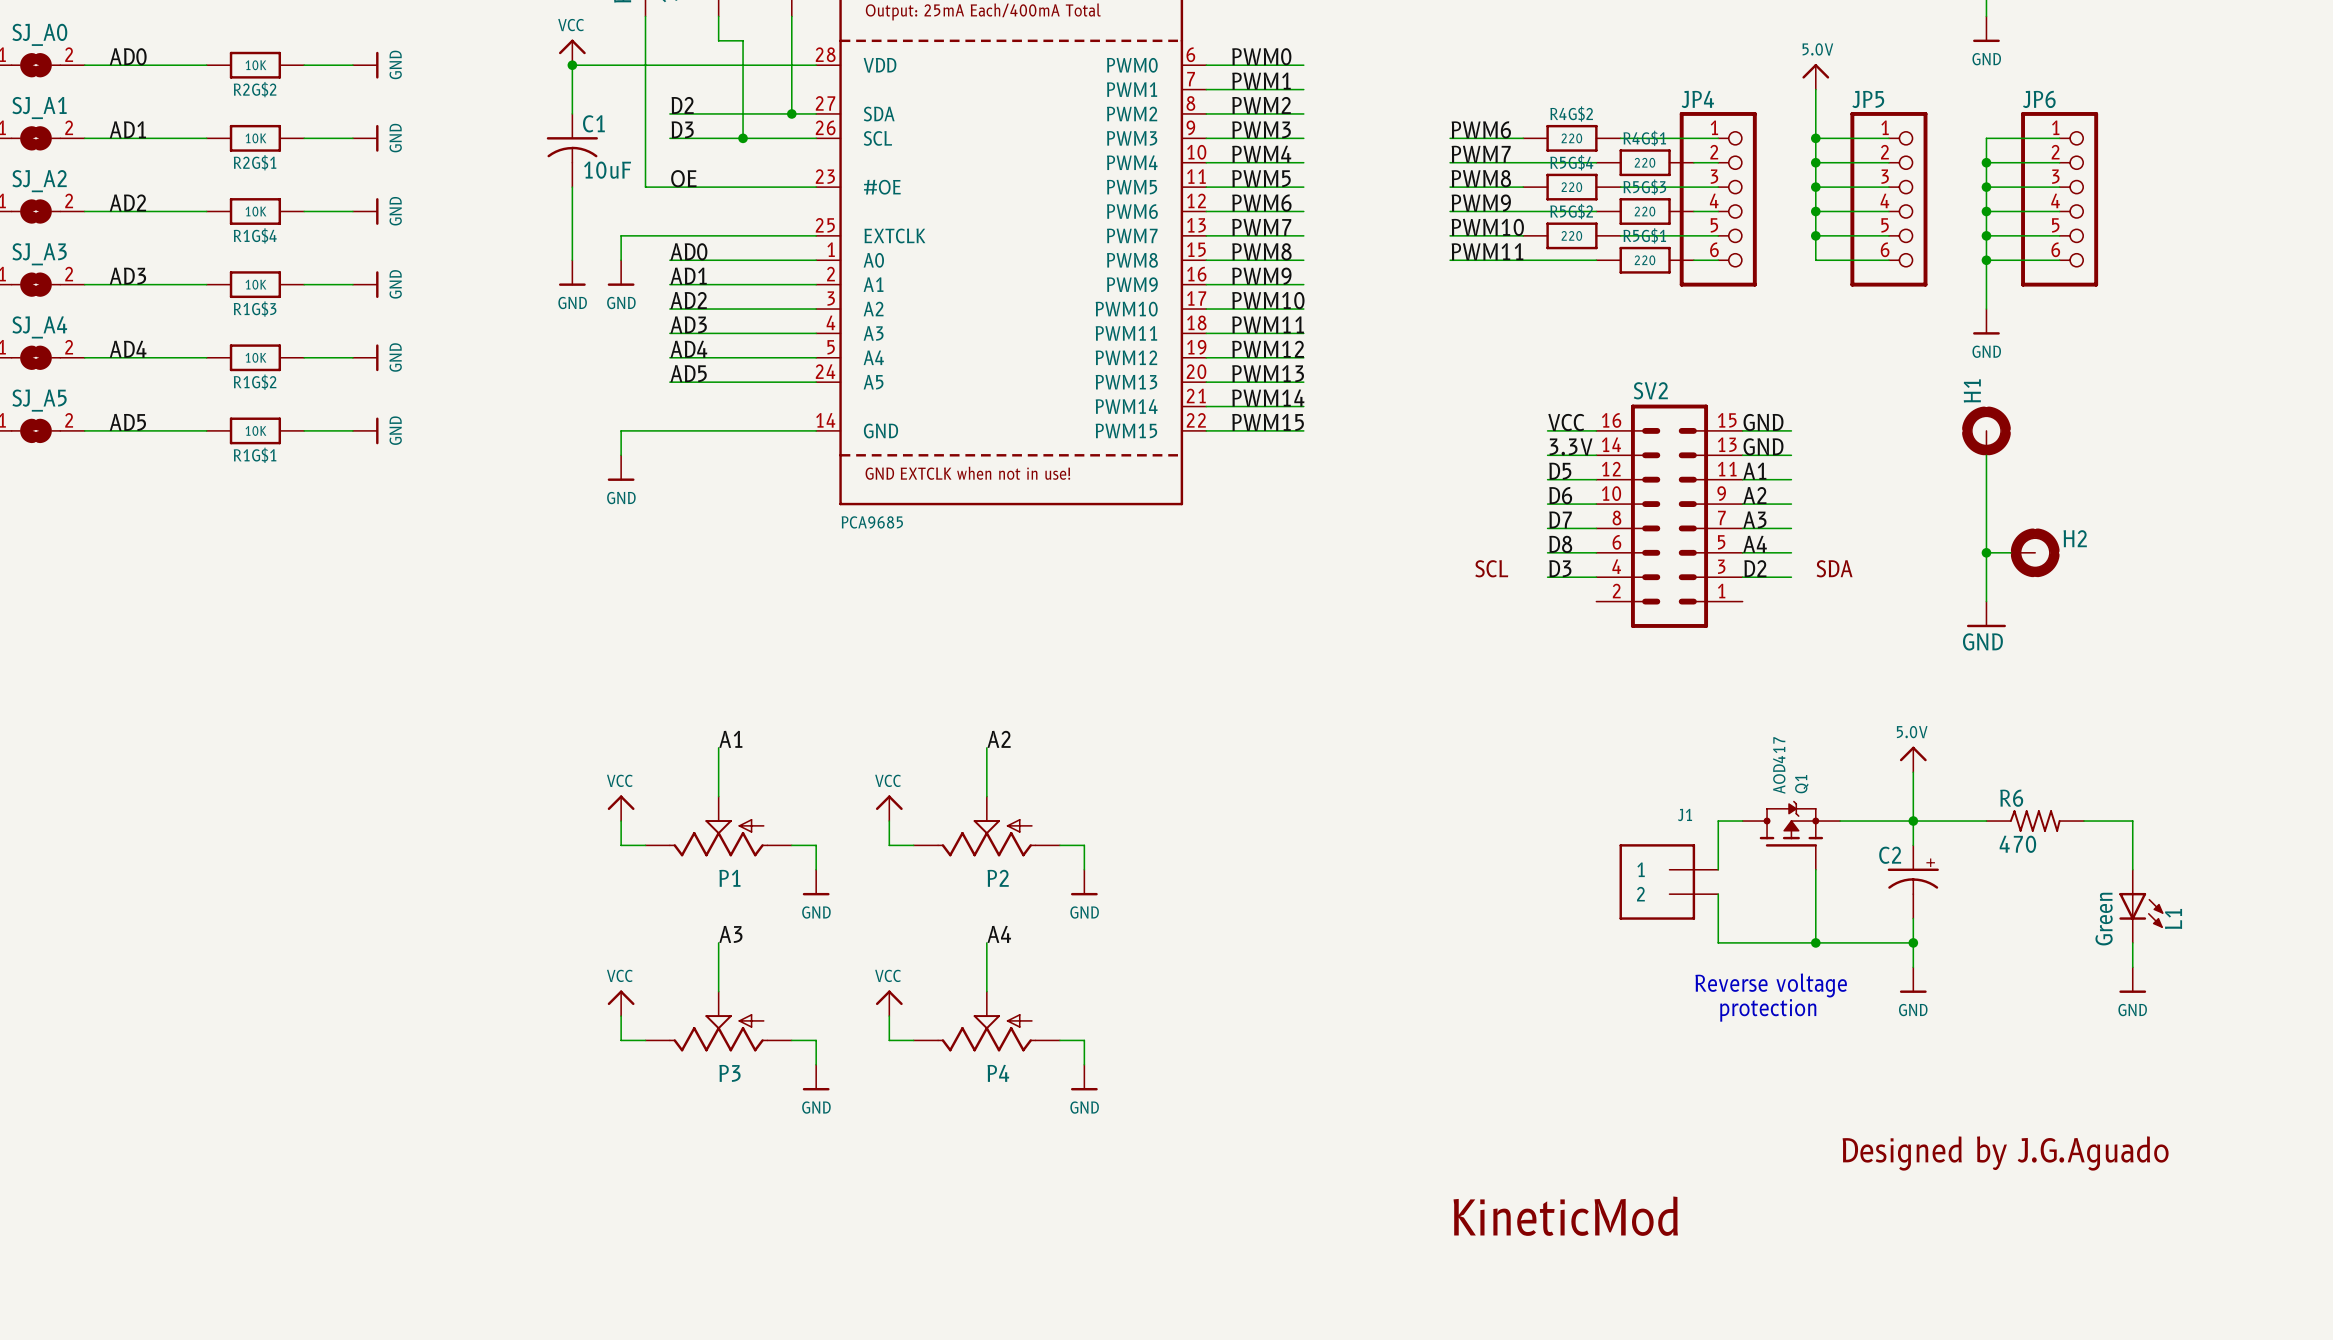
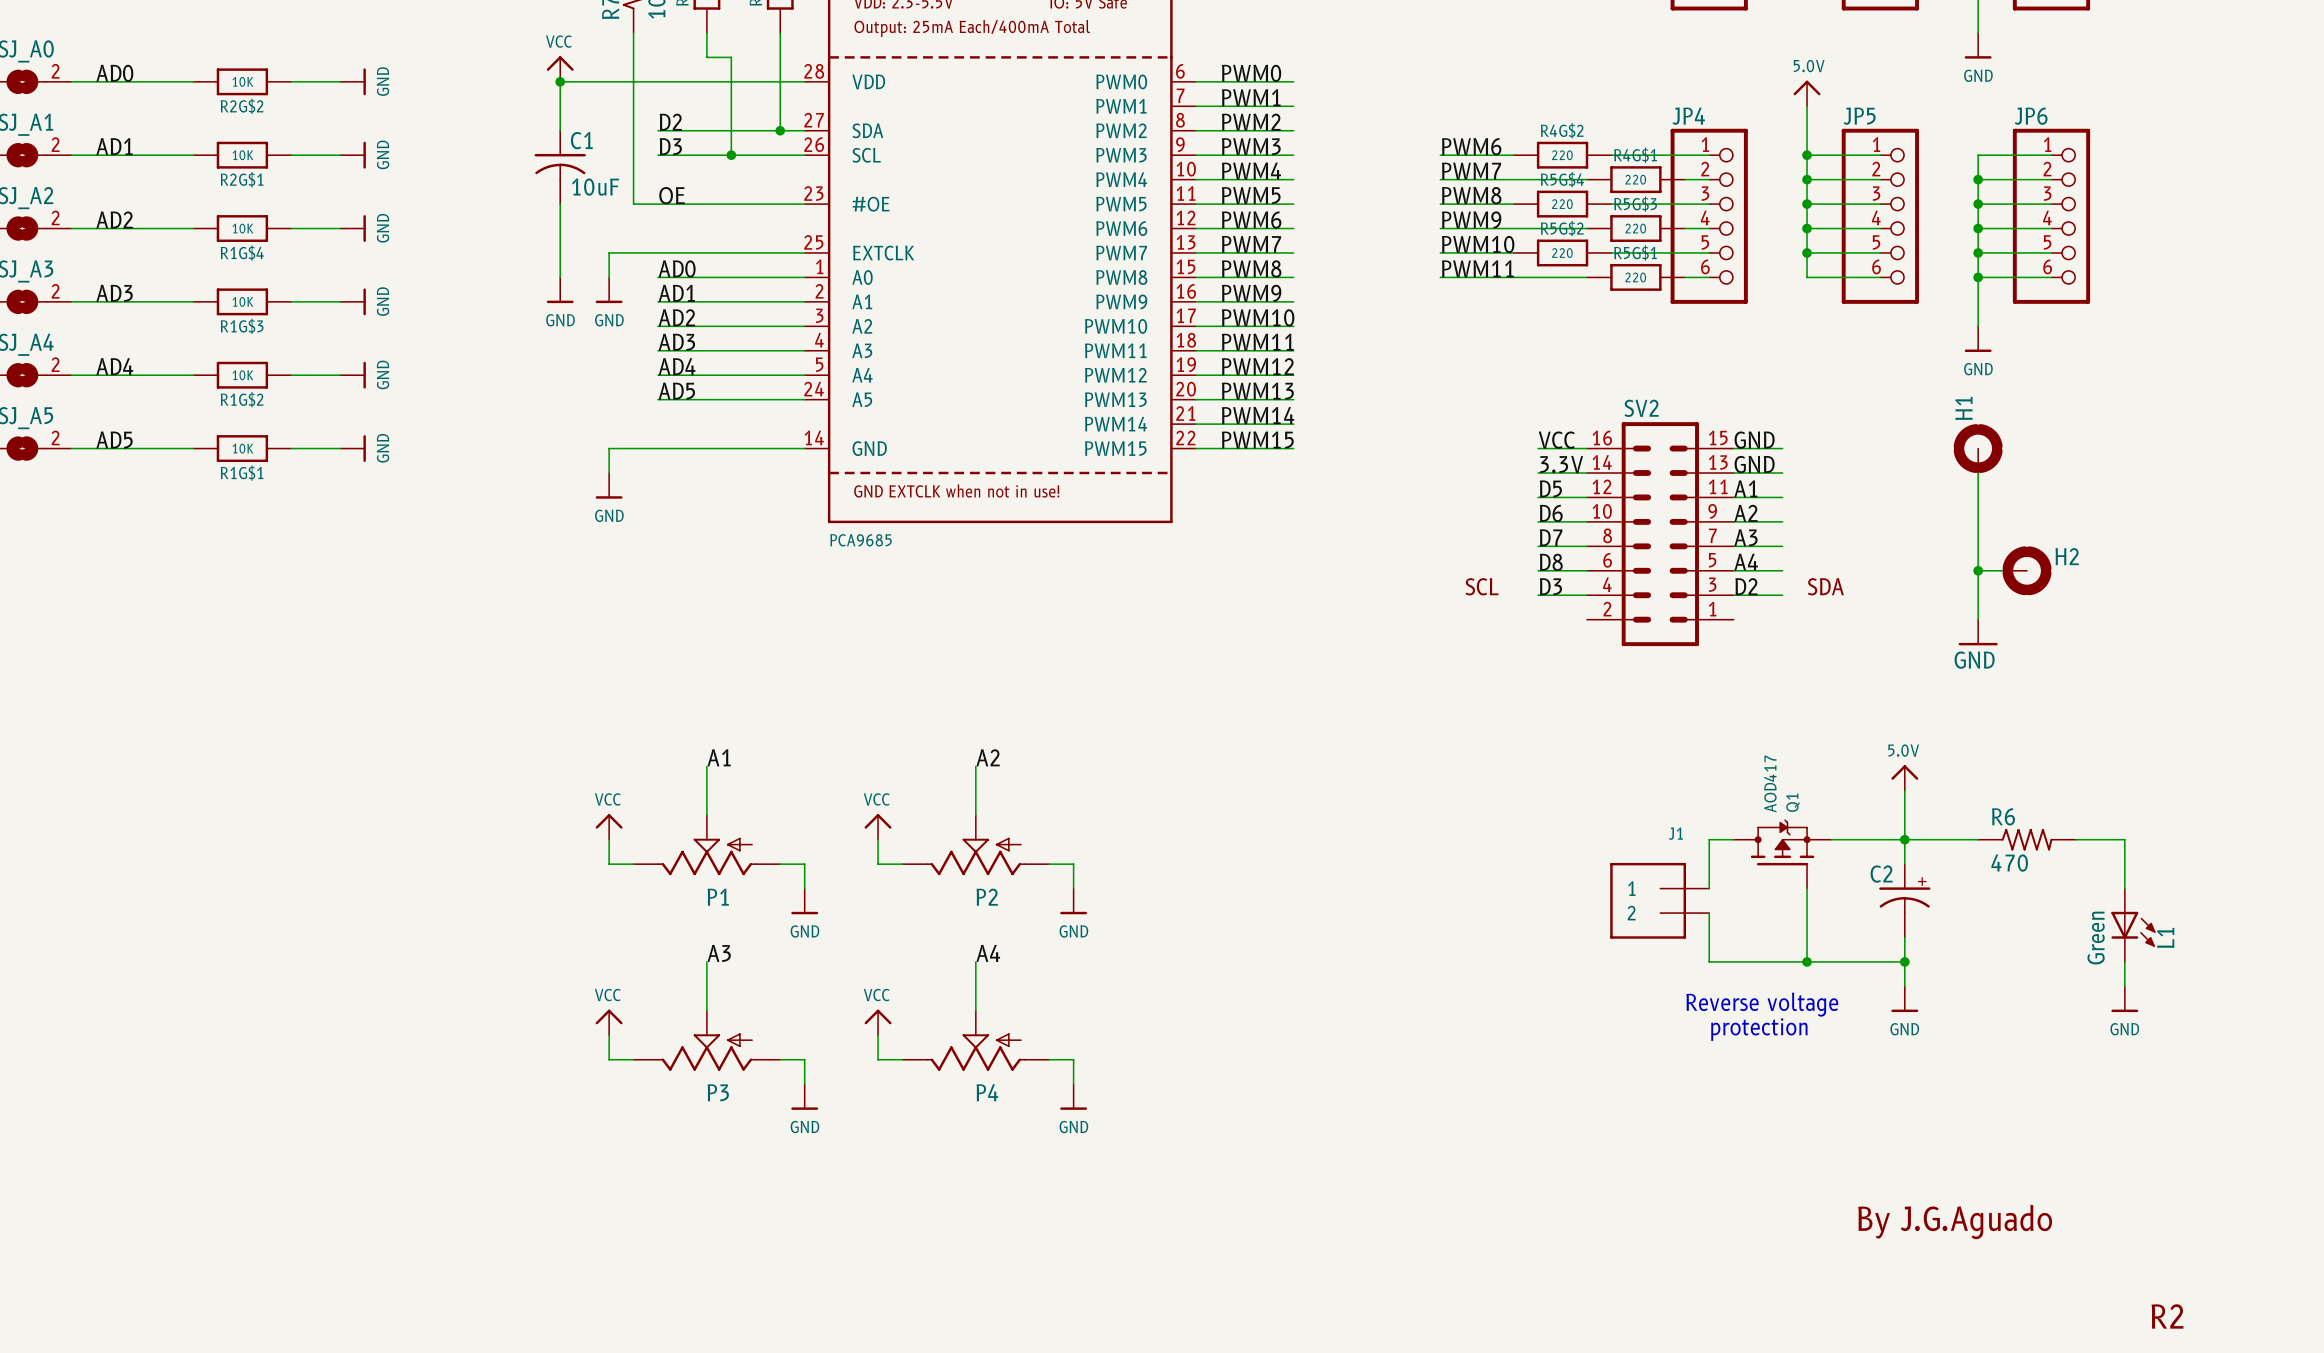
text: Designed by J.G.Aguado (2005, 1153) -> By J.G.Aguado (1955, 1221)
text: KineticMod (1565, 1216) -> none
text: none -> R2 (2167, 1316)

